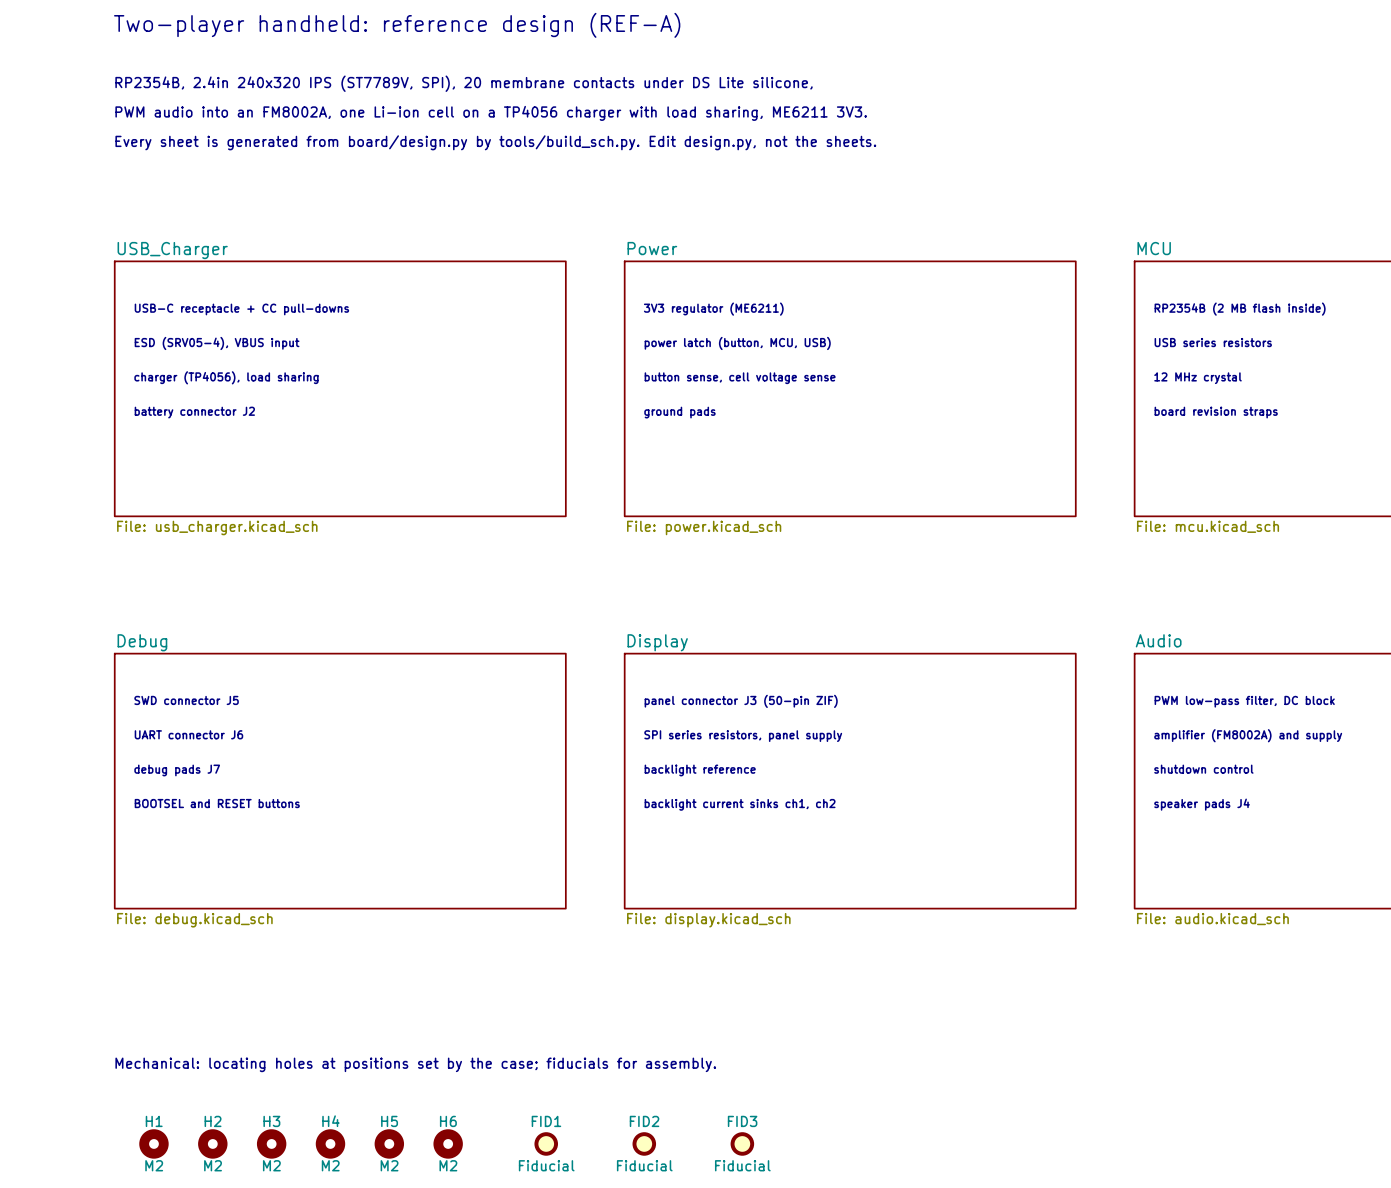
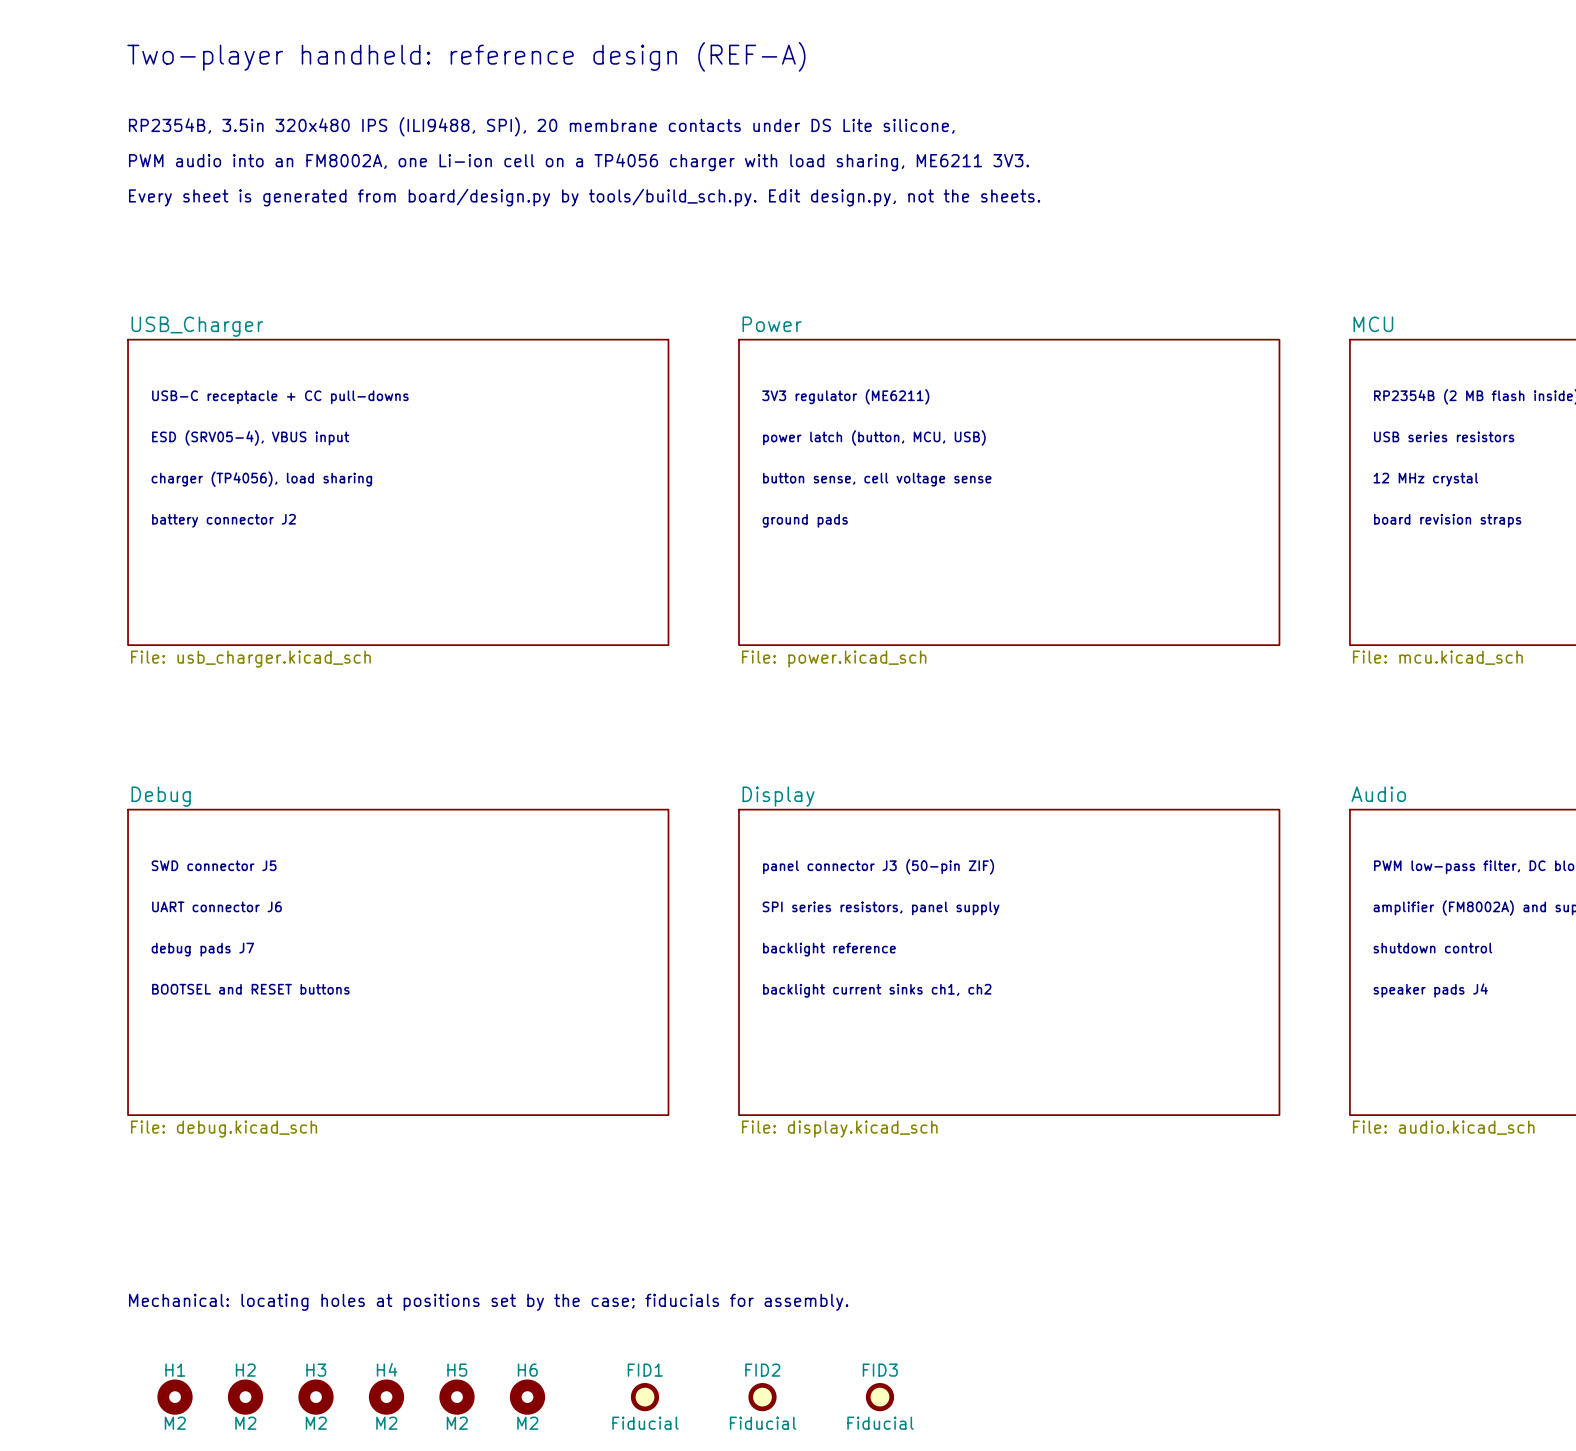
text: RP2354B, 2.4in 240x320 IPS (ST7789V, SPI), 20 membrane contacts under DS Lite silicone, (464, 83) -> RP2354B, 3.5in 320x480 IPS (ILI9488, SPI), 20 membrane contacts under DS Lite silicone, (541, 126)

